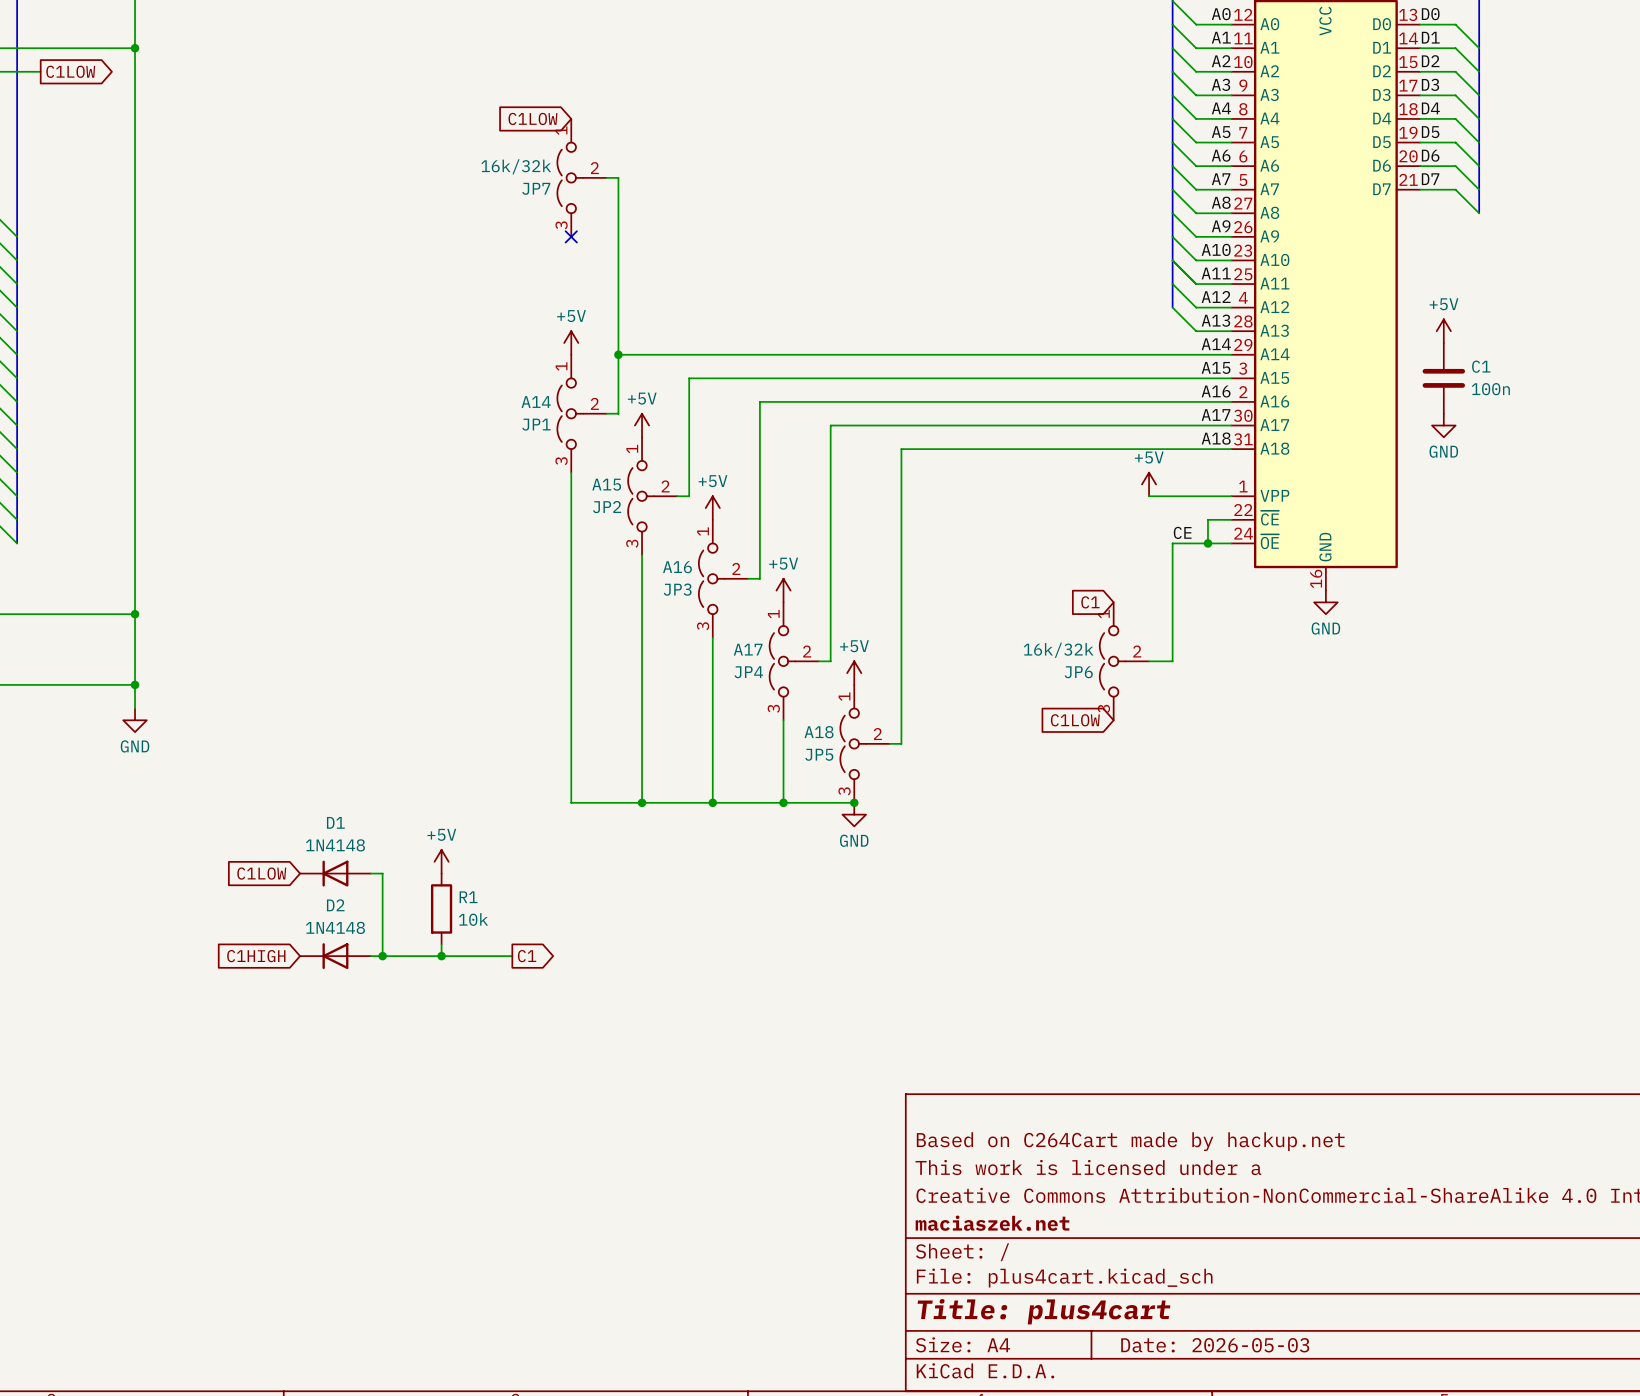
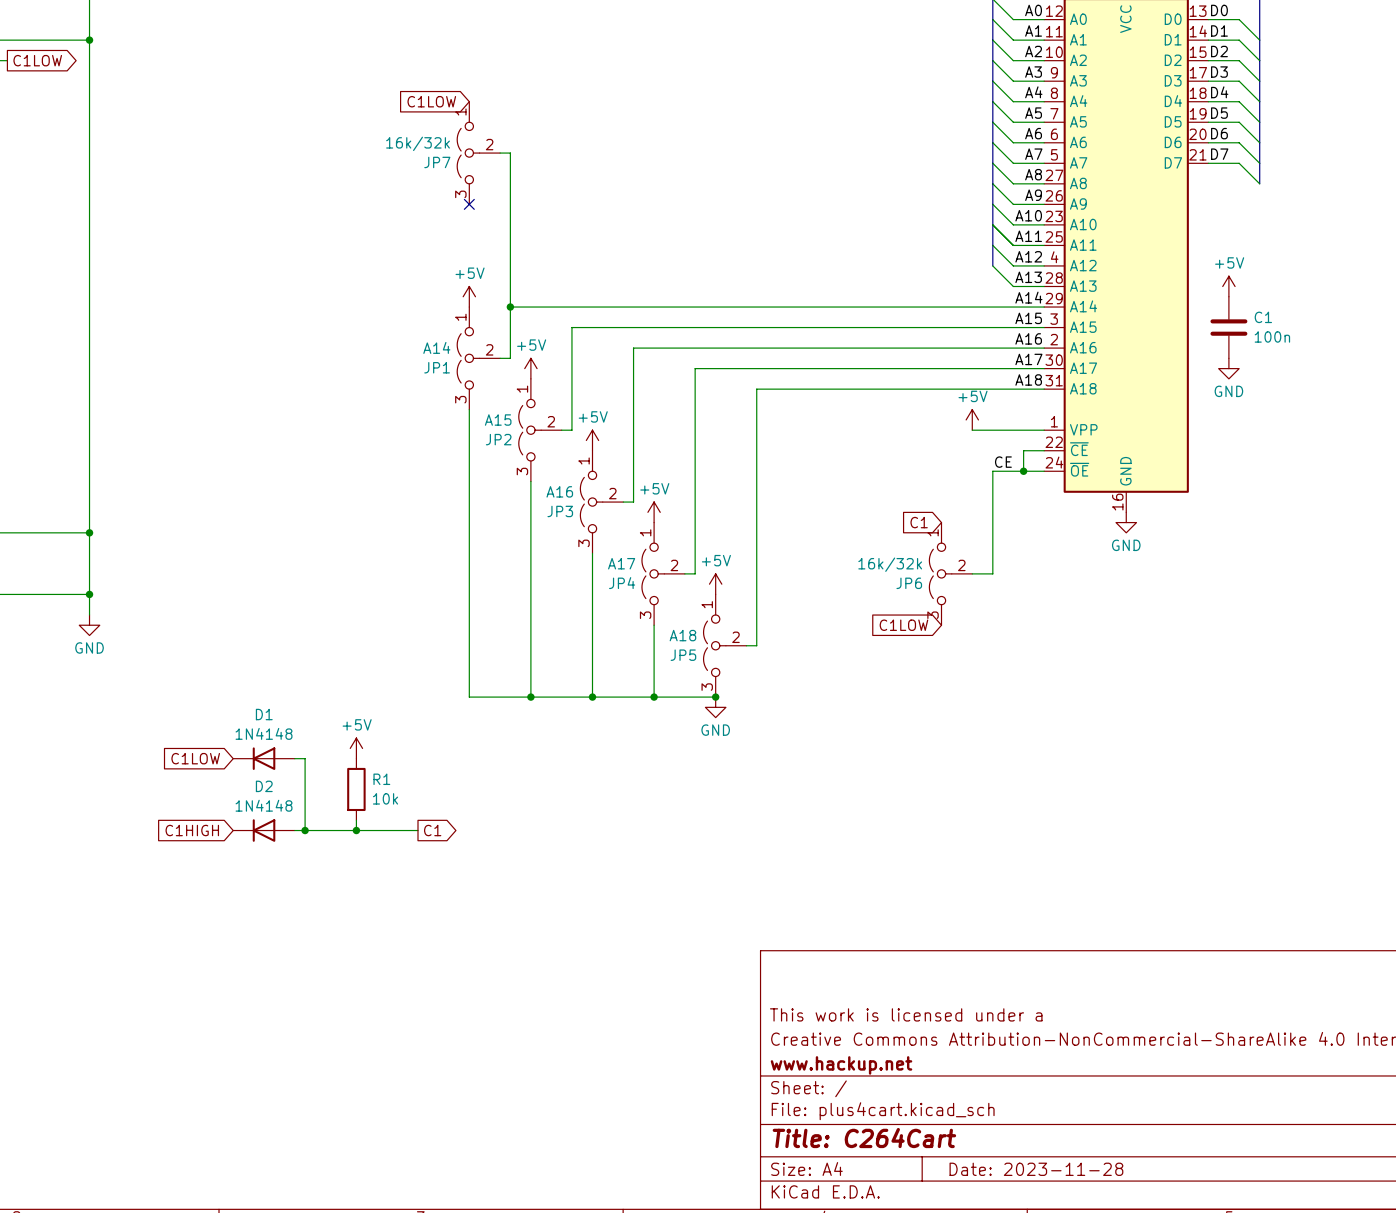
title block: Based on C264Cart made by hackup.net (1130, 1141) -> none
title block: maciaszek.net (992, 1223) -> www.hackup.net (841, 1065)
title block: Title: plus4cart (1043, 1311) -> Title: C264Cart (864, 1138)
title block: Date: 2026-05-03 (1215, 1345) -> Date: 2023-11-28 (1036, 1169)

